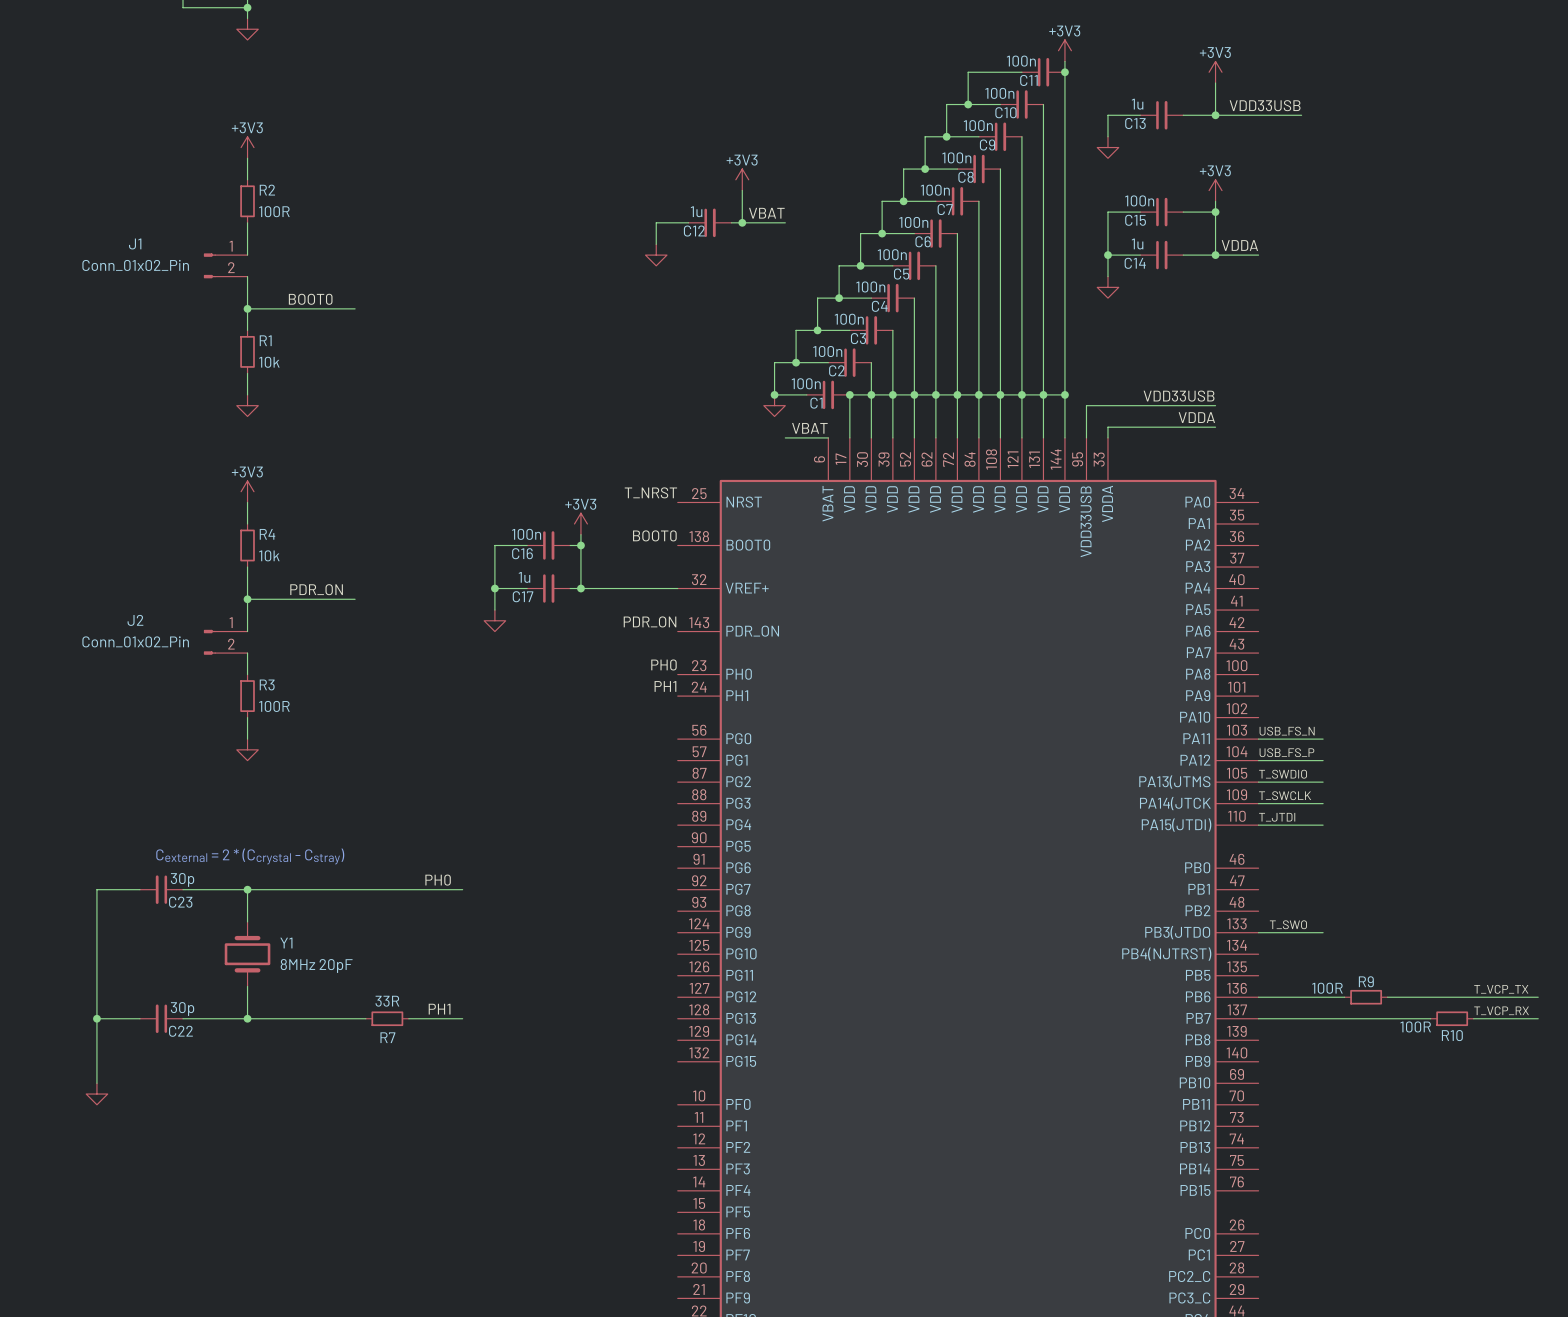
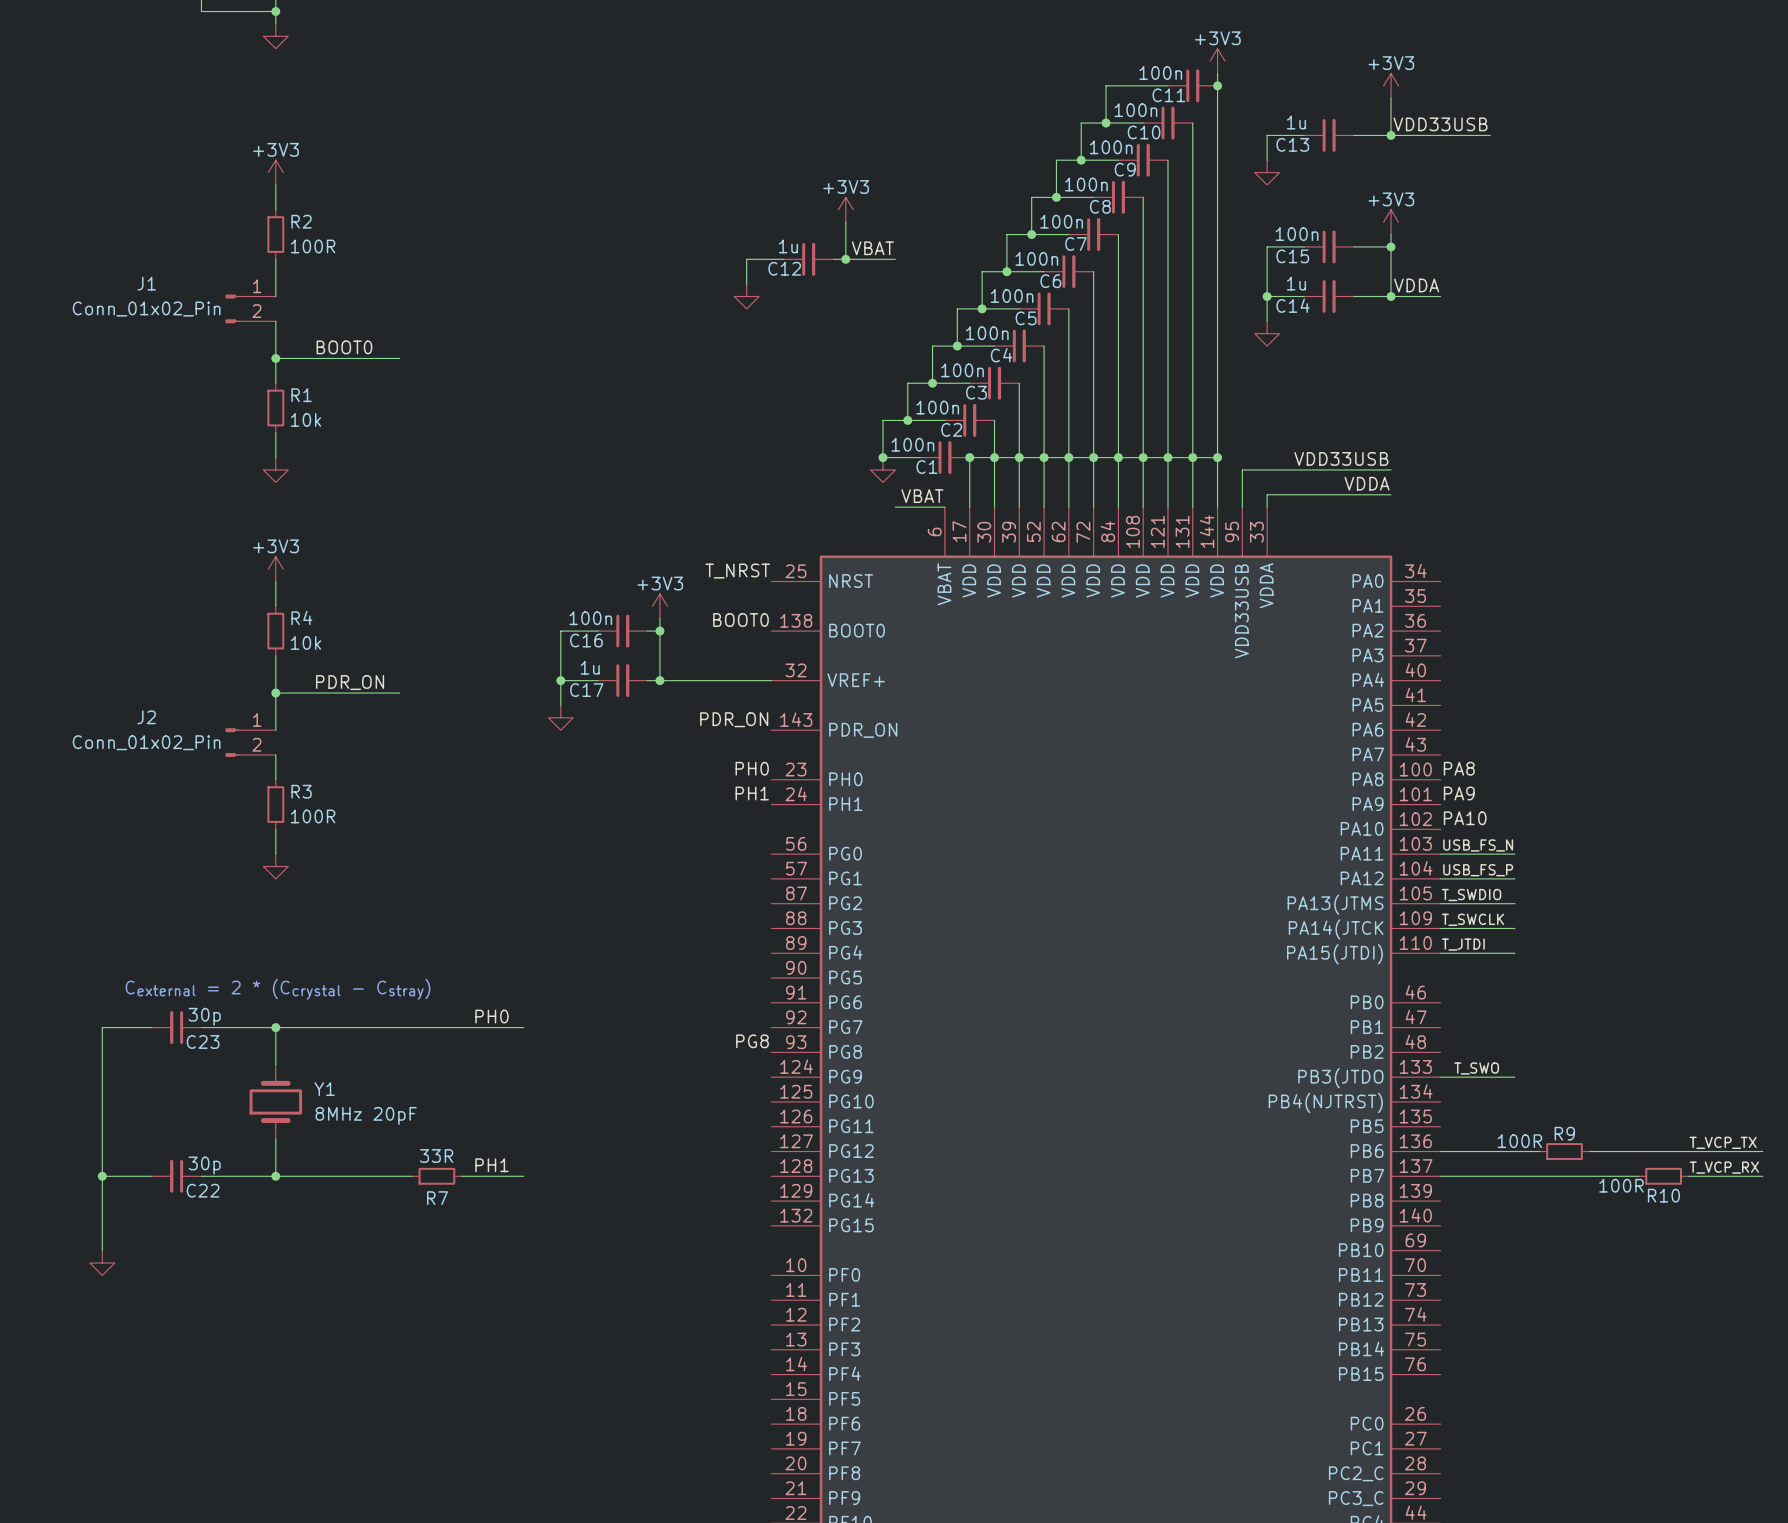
label: none -> PA8 (1459, 768)
label: none -> PA9 (1459, 793)
label: none -> PA10 (1465, 818)
label: none -> PG8 (752, 1041)

